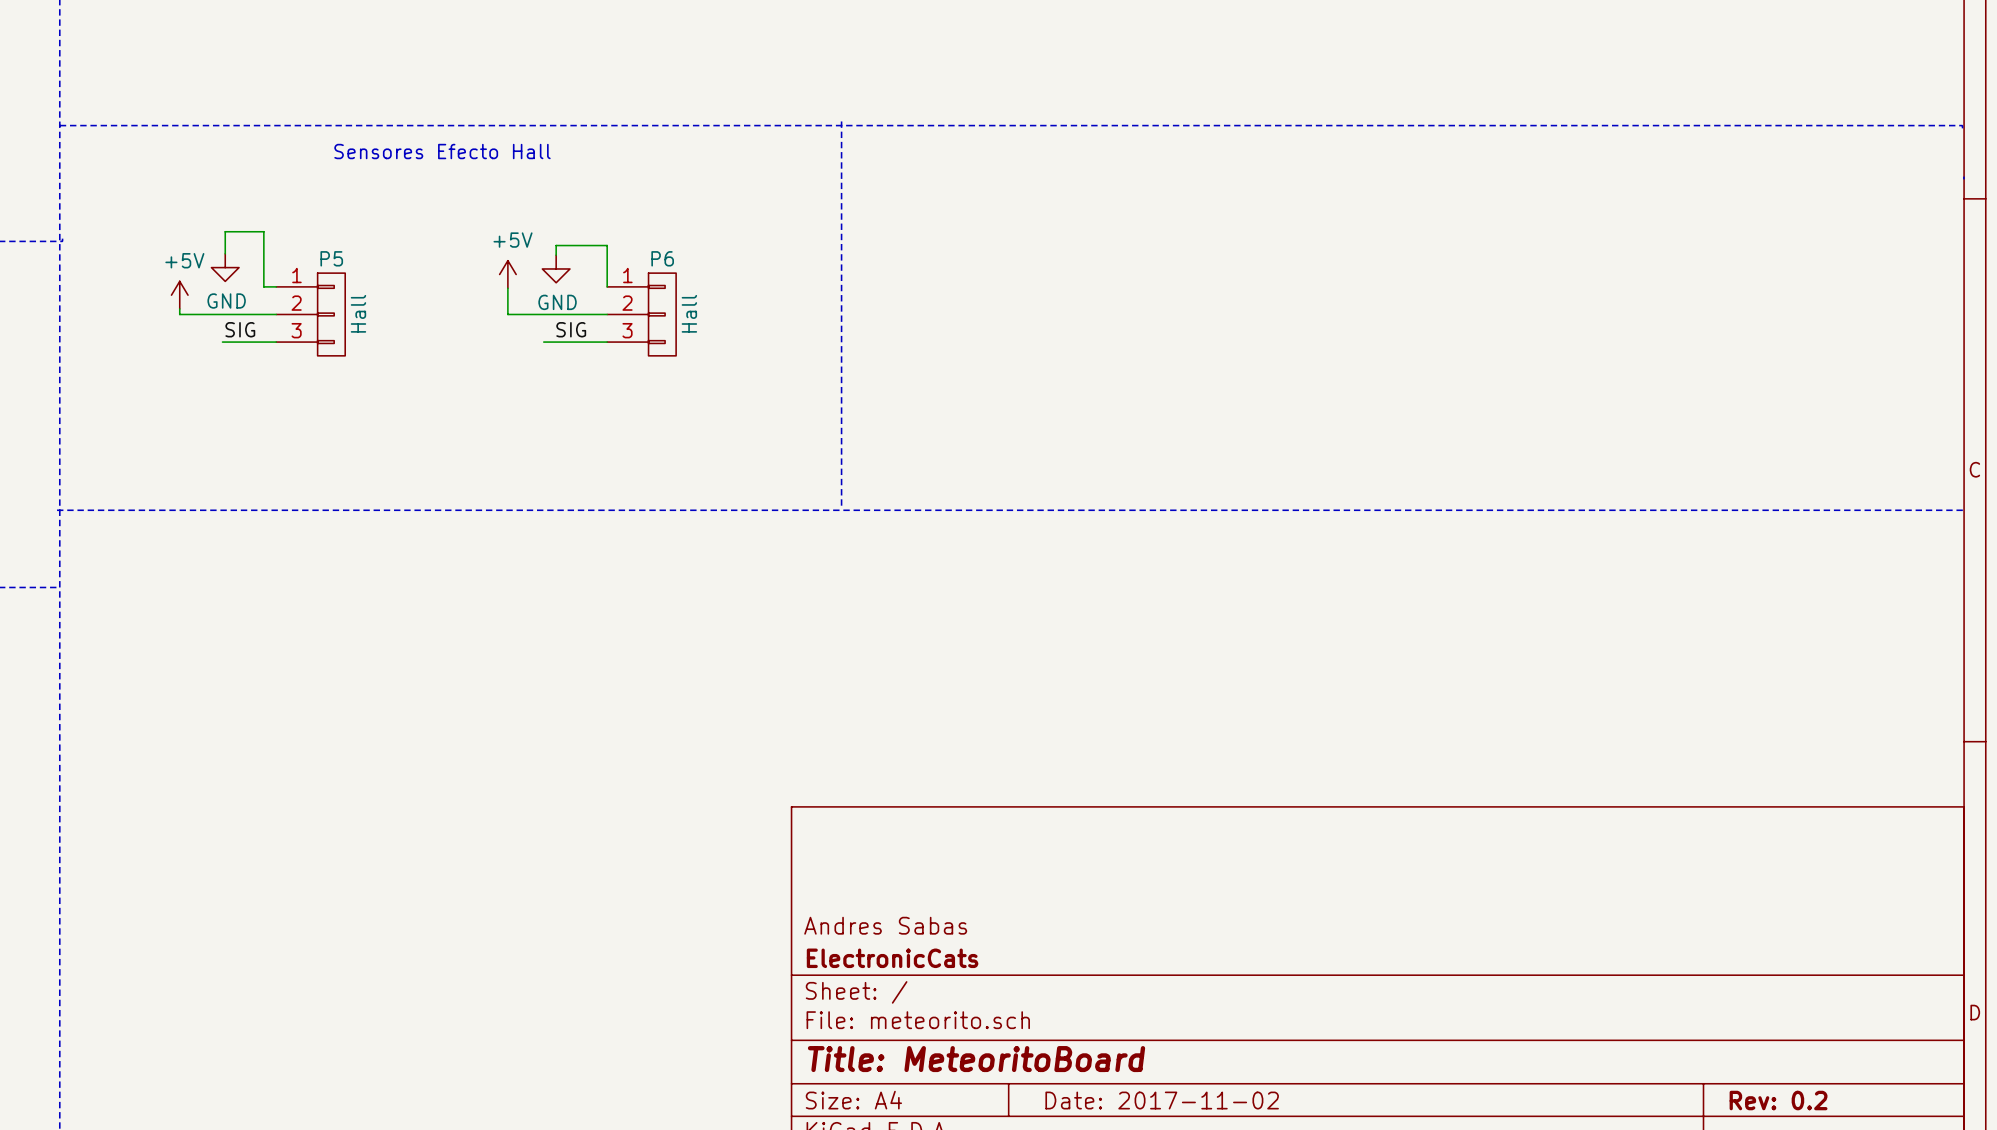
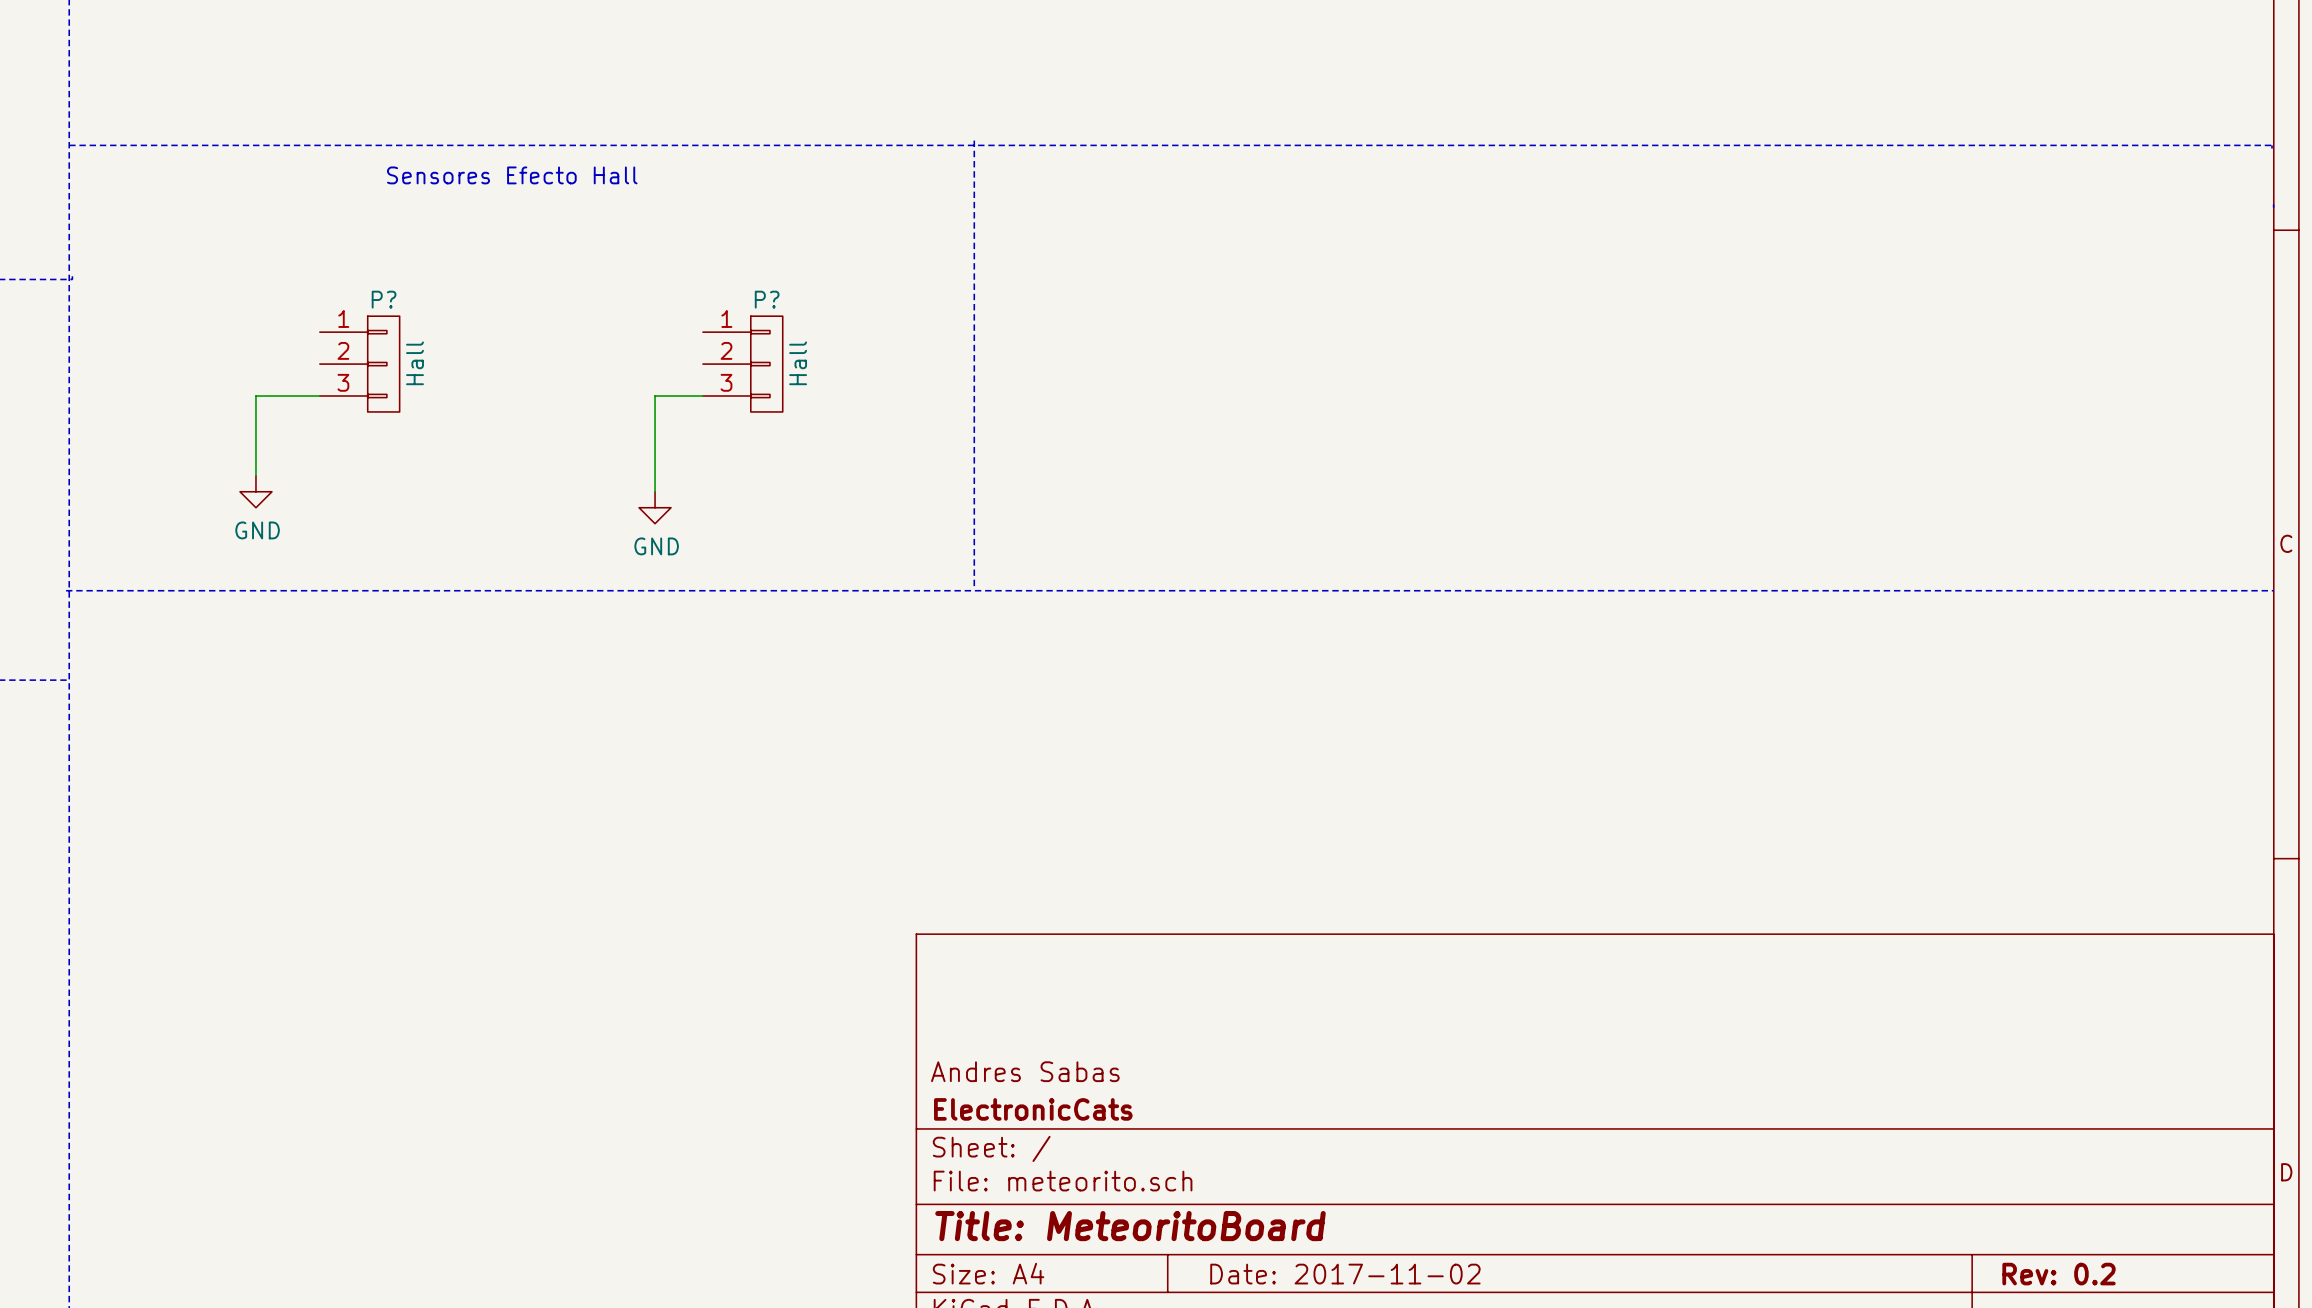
wire: (225, 253) (225, 231) (263, 231) (263, 286) (276, 286) -> none
wire: (556, 255) (556, 245) (607, 245) (607, 286) -> none
P5 name: P5 (331, 258) -> P? (384, 299)
P6 name: P6 (662, 258) -> P? (767, 299)
power symbol position: GND (225, 267) -> GND (255, 491)
power symbol position: GND (556, 268) -> GND (655, 507)
power symbol: +5V (507, 274) -> none
wire: (507, 288) (507, 314) (607, 314) -> none
power symbol: +5V (179, 295) -> none
wire: (179, 308) (179, 314) (276, 314) -> none
label: SIG (240, 329) -> none
label: SIG (571, 329) -> none
wire: none -> (257, 396) (255, 396) (255, 475)
wire: (543, 342) (565, 342) -> (655, 491) (655, 396)

